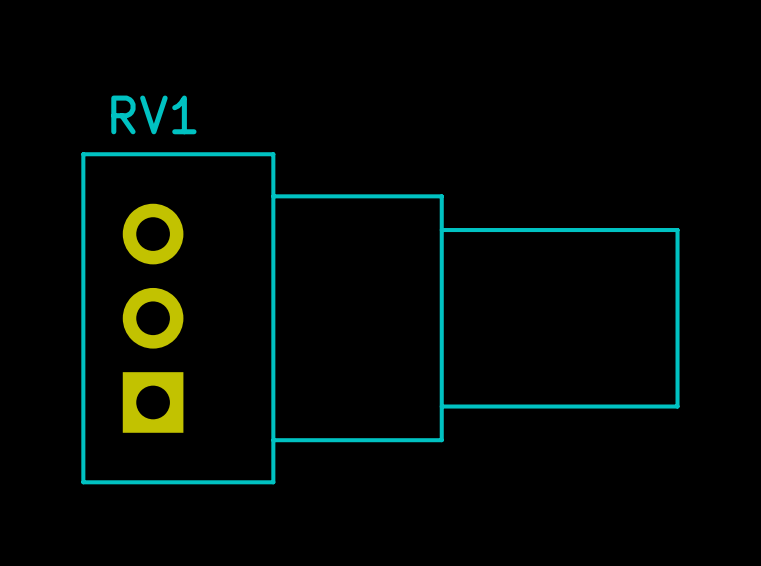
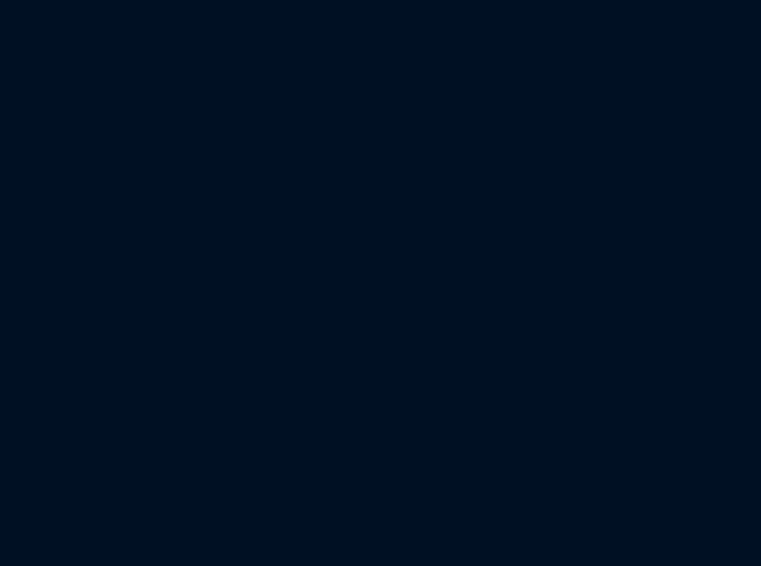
RV1: (380, 318) -> none

